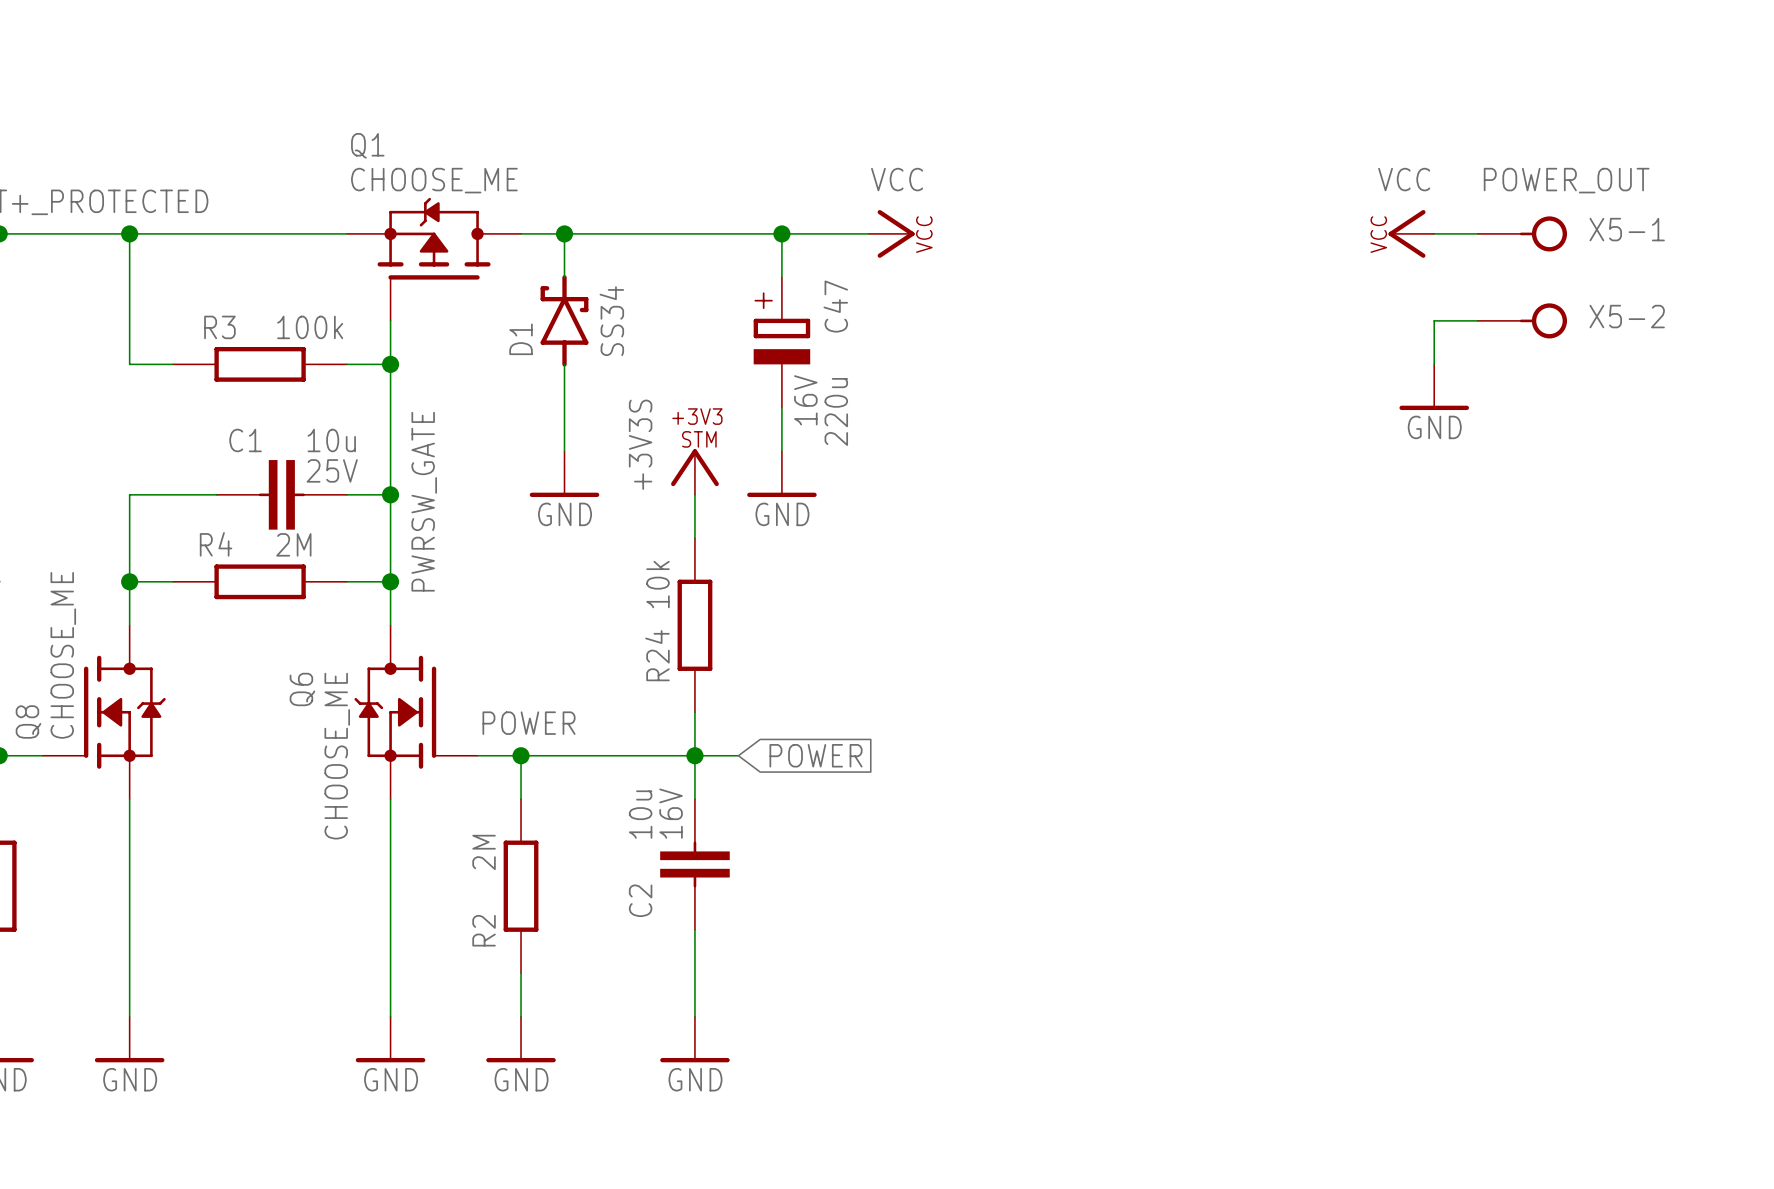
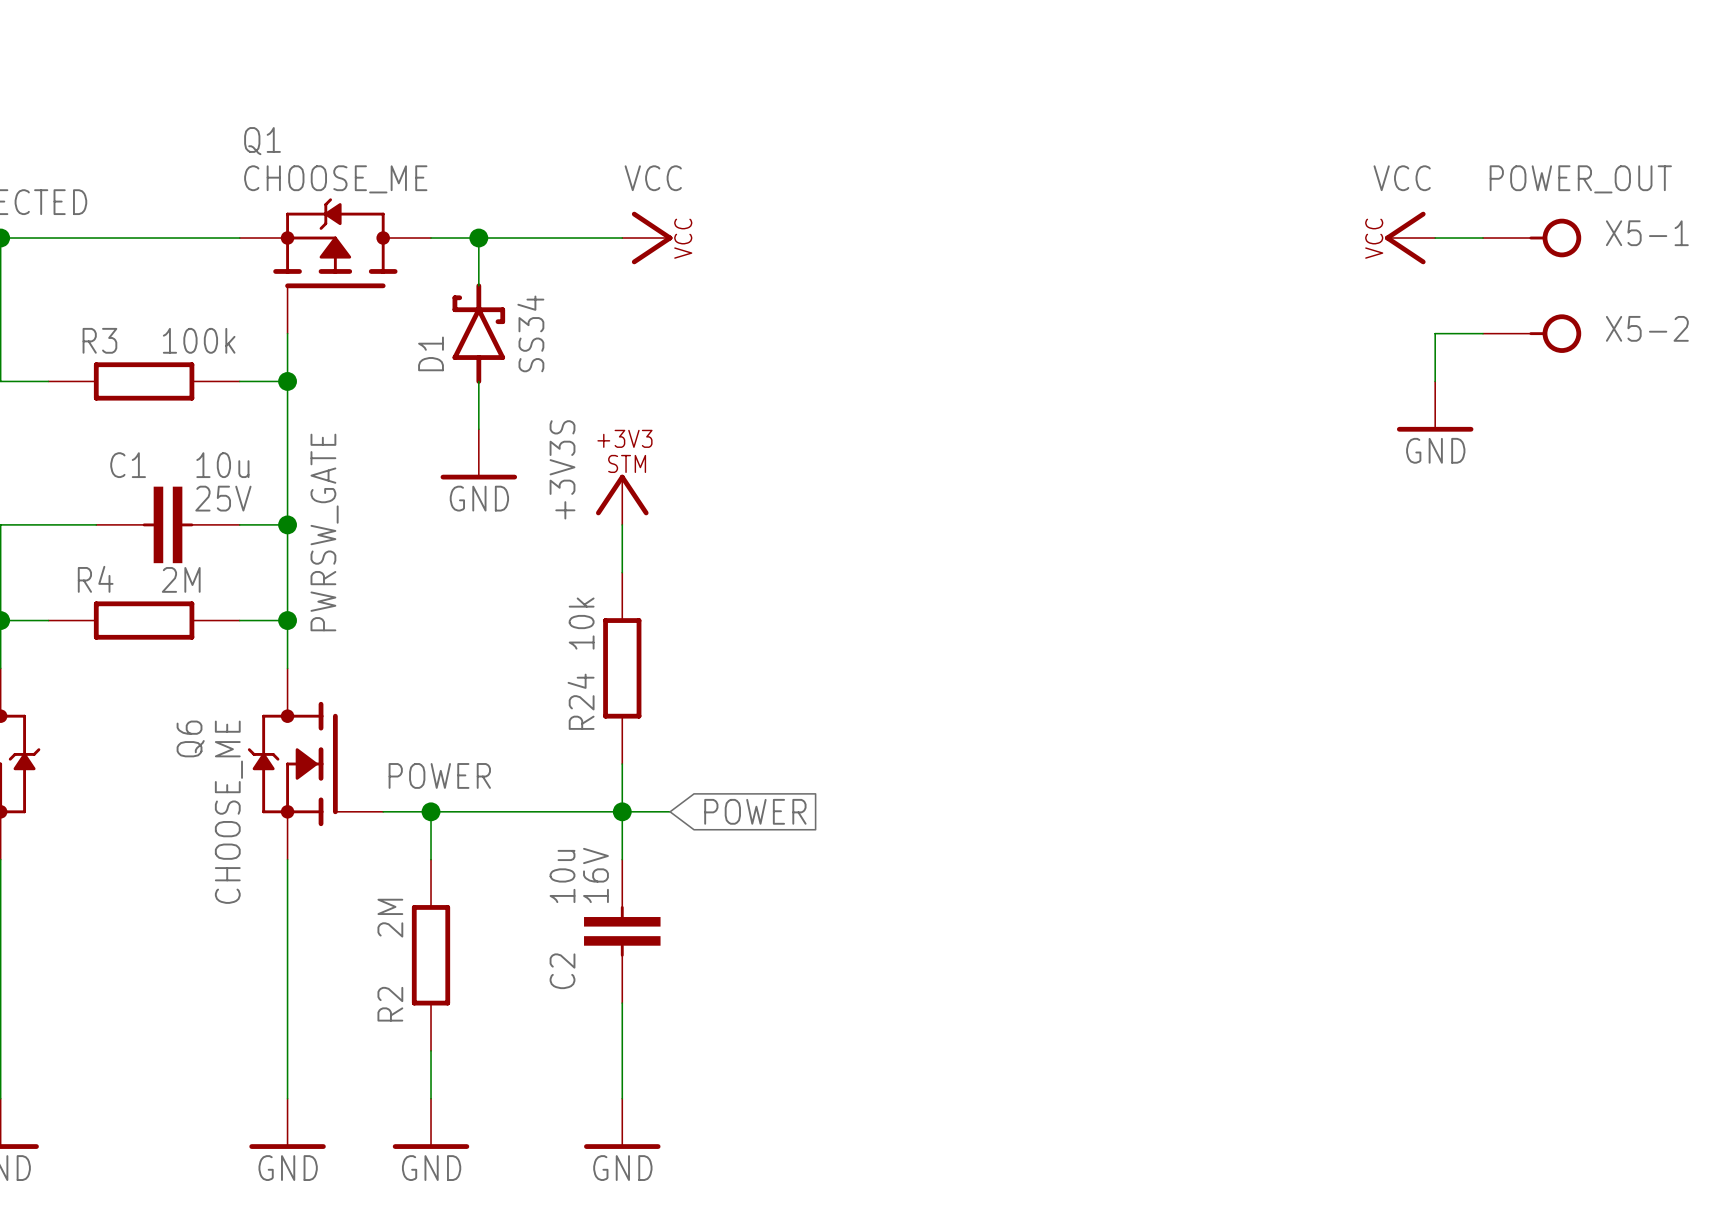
wire: (694, 233) (868, 233) -> none
wire: (781, 233) (781, 277) -> none
junction: (781, 233) -> none
power symbol position: VCC (891, 233) -> VCC (647, 238)
C47: 220u (781, 342) -> none
wire: (781, 407) (781, 451) -> none
power symbol position: GND (564, 474) -> GND (478, 454)
power symbol: GND (781, 474) -> none

